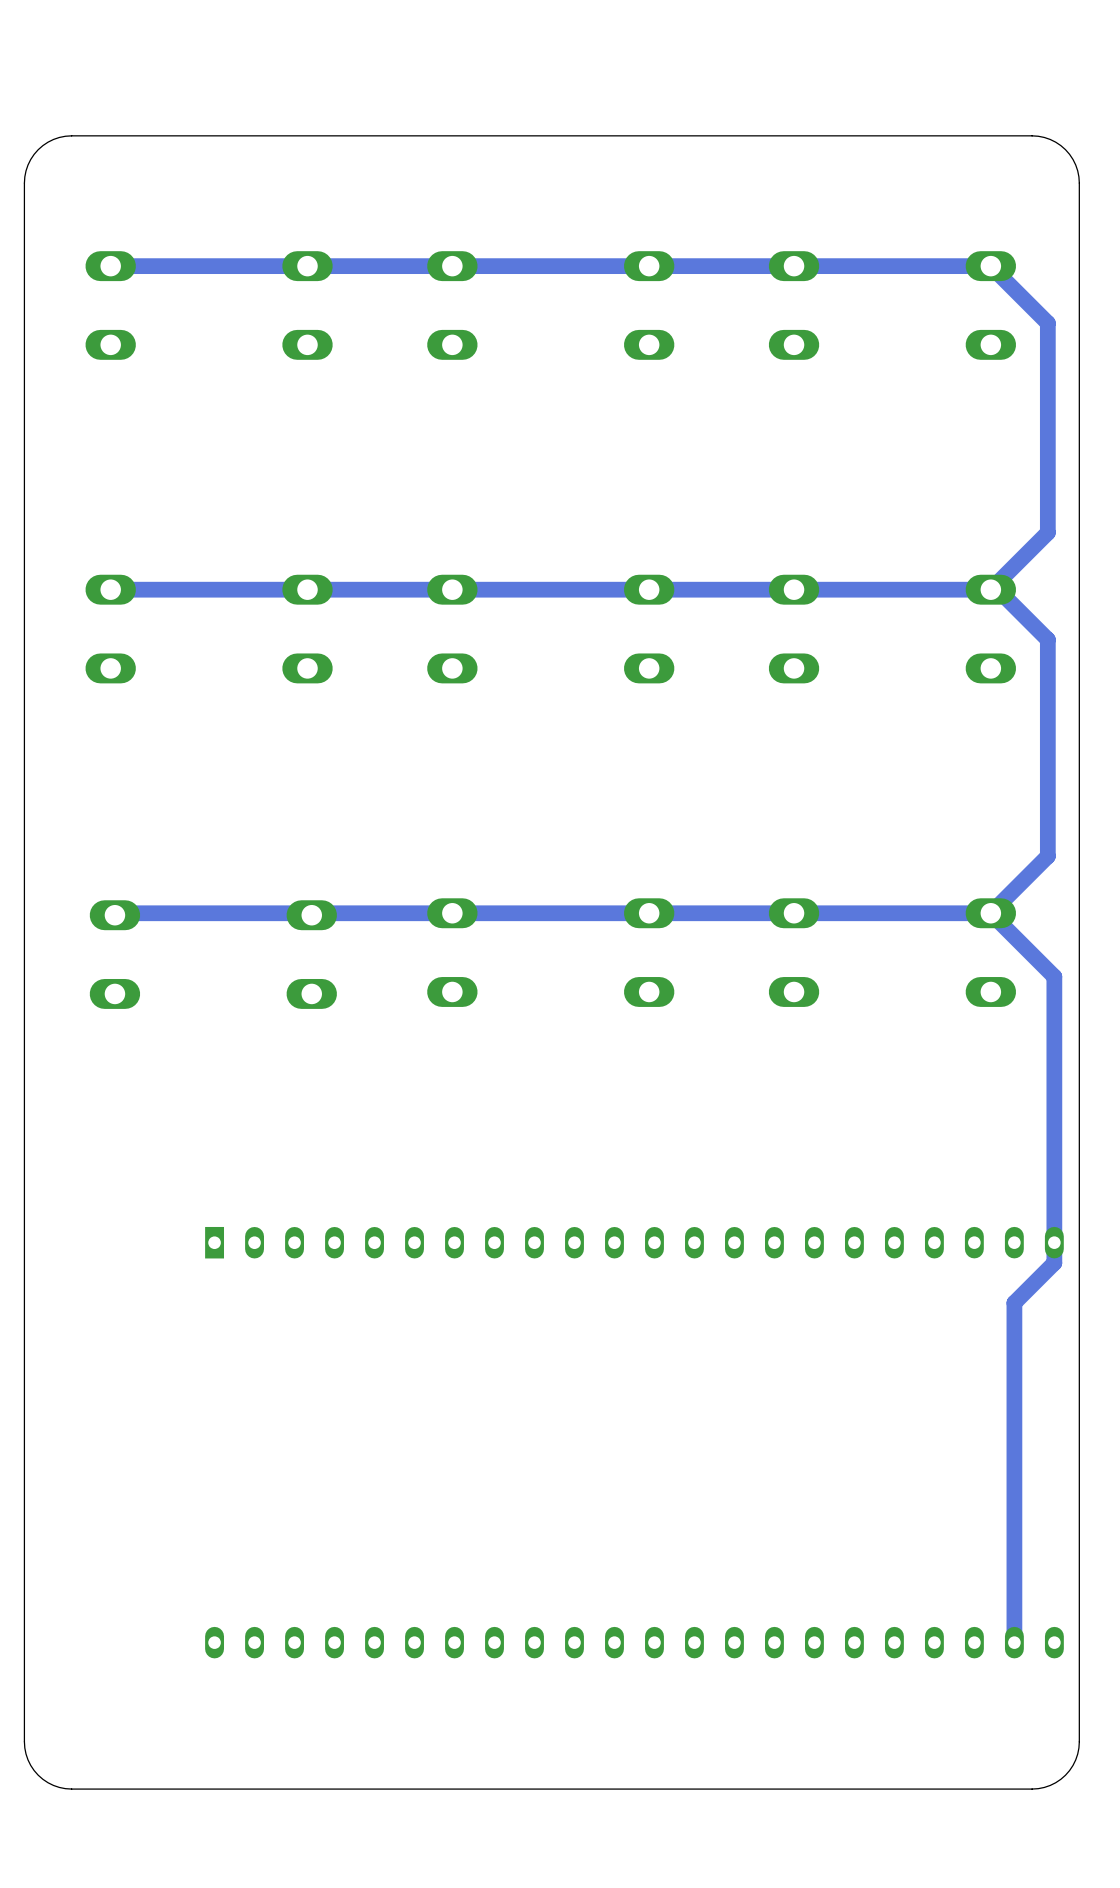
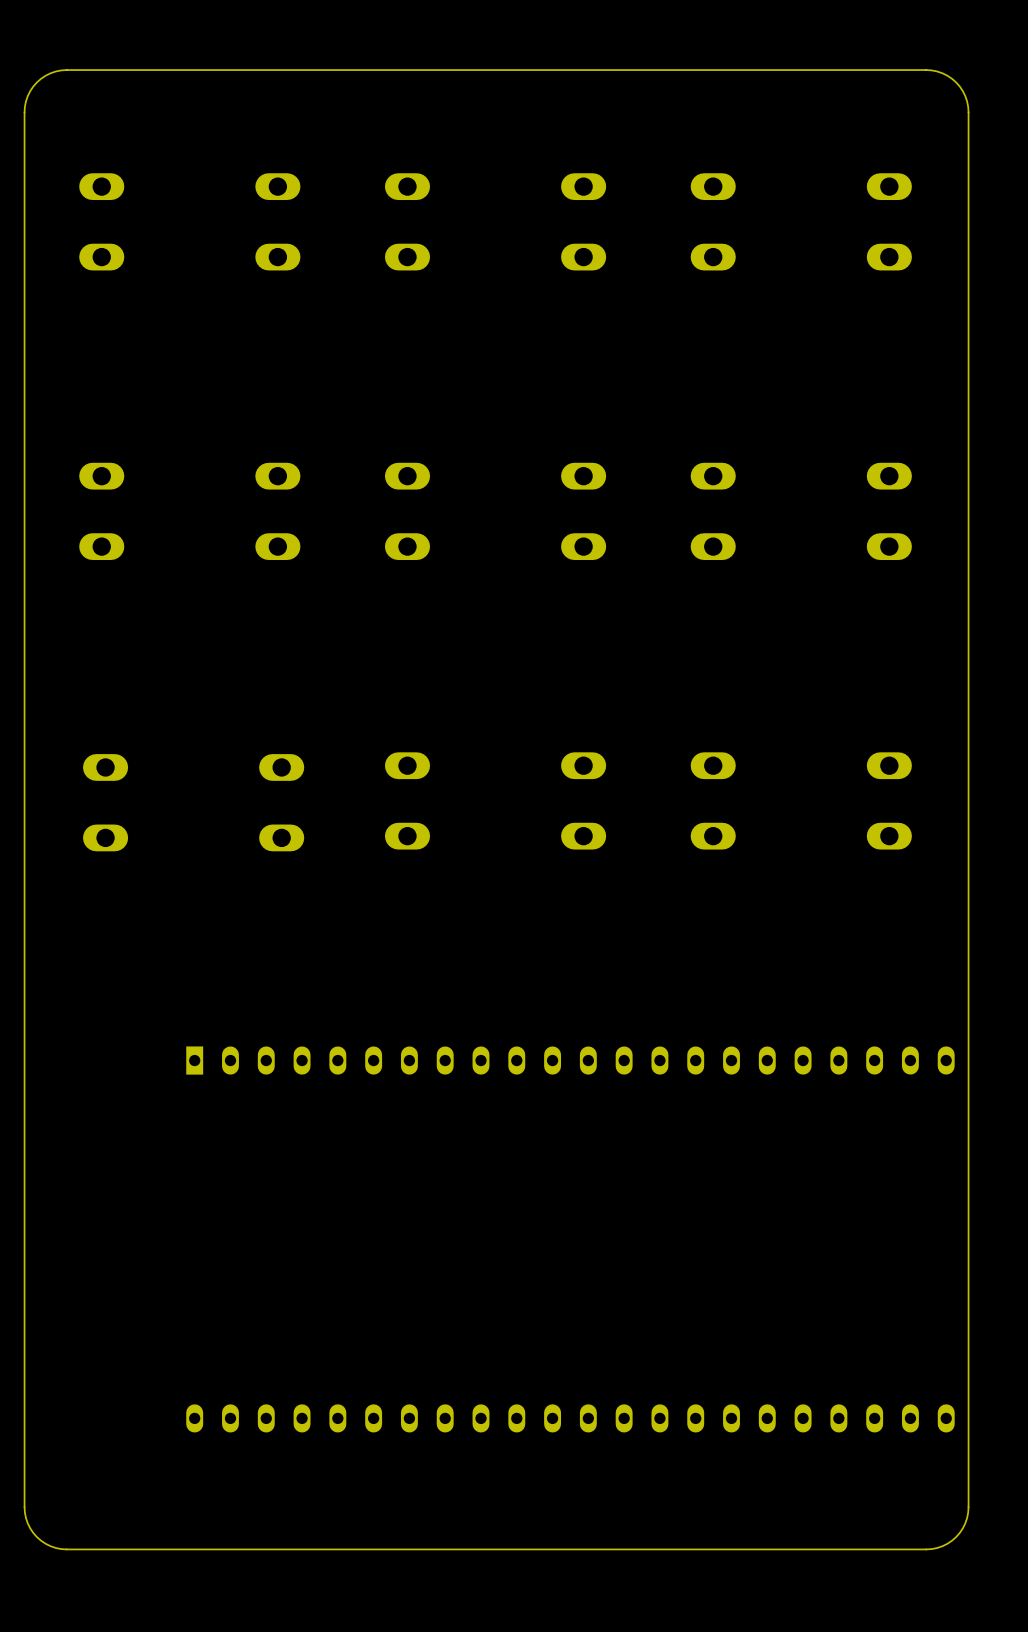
track: (110, 266) (990, 266) (1047, 323) (1047, 532) (990, 589) -> none
track: (110, 589) (997, 589) (1047, 639) (1047, 856) (990, 913) -> none
track: (990, 913) (116, 913) (114, 915) -> none
track: (990, 913) (1054, 976) (1054, 1262) (1014, 1302) (1014, 1642) -> none

